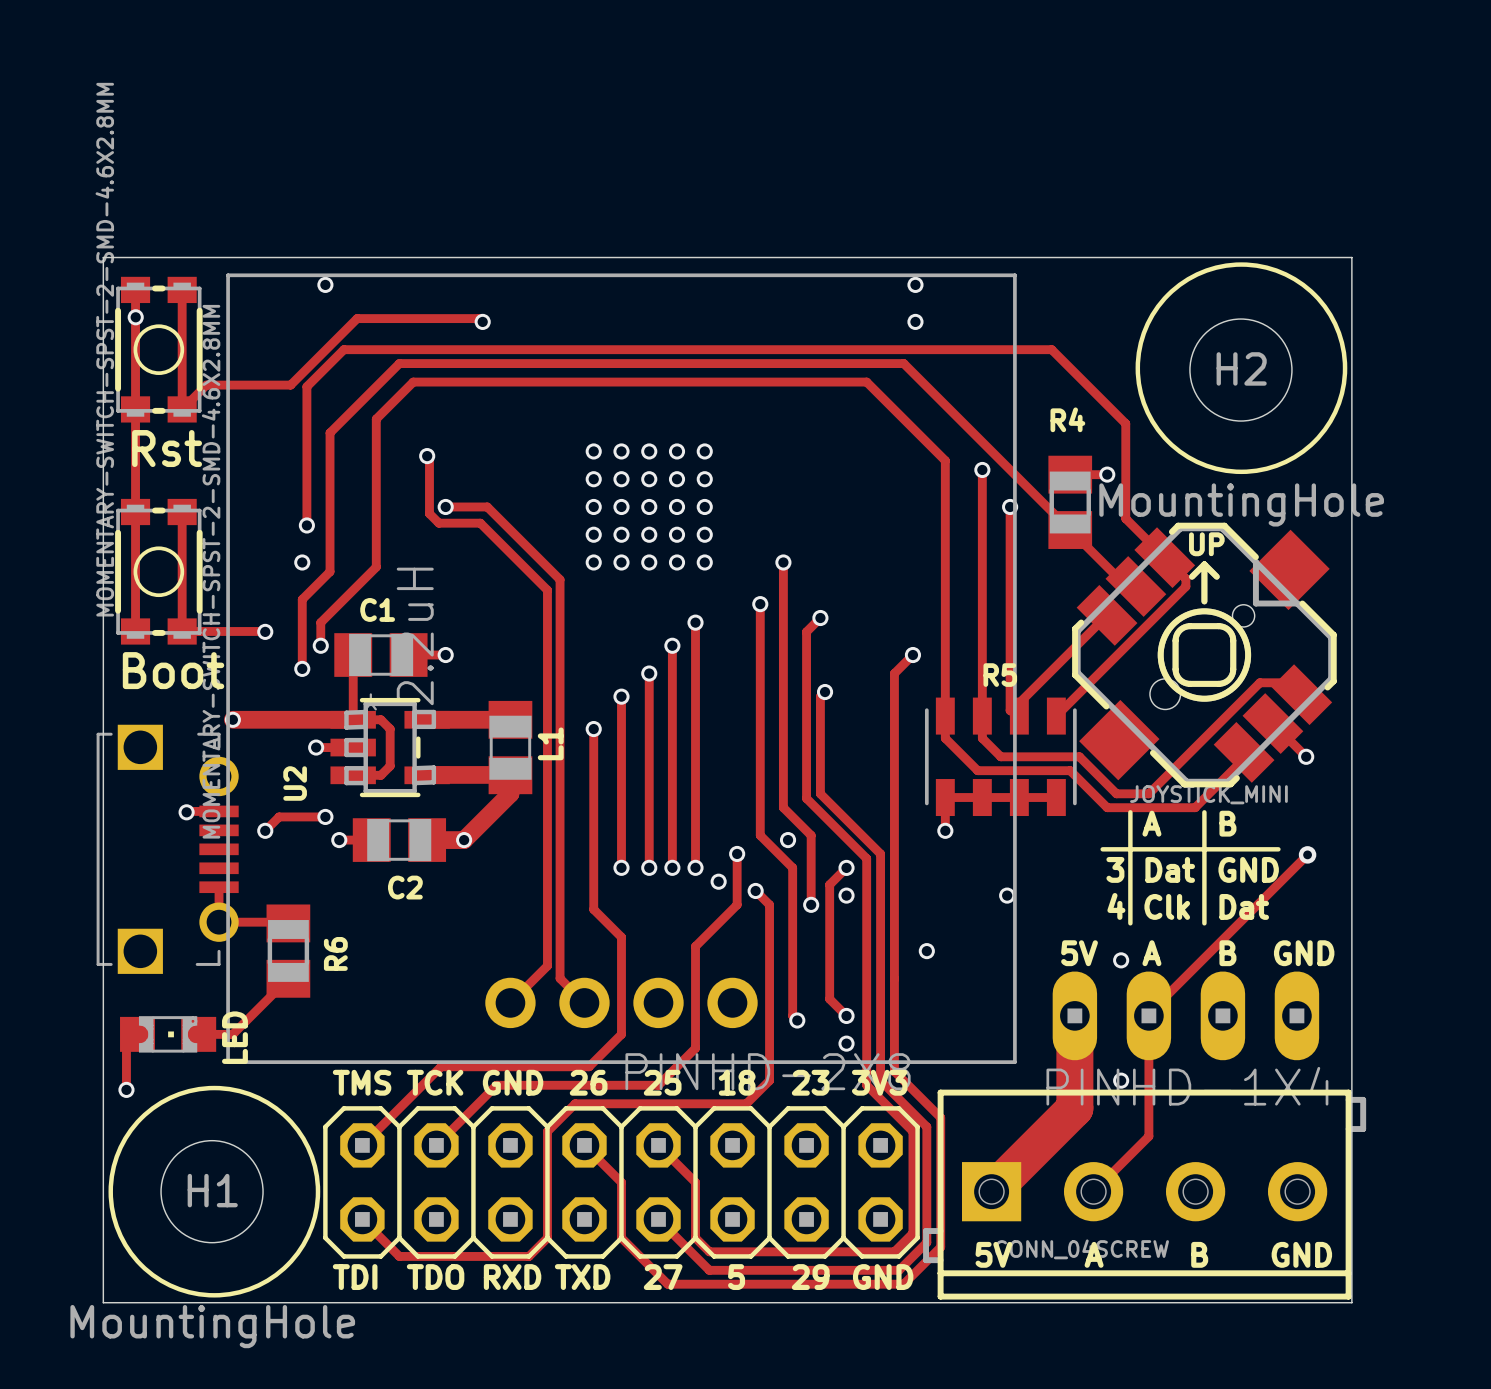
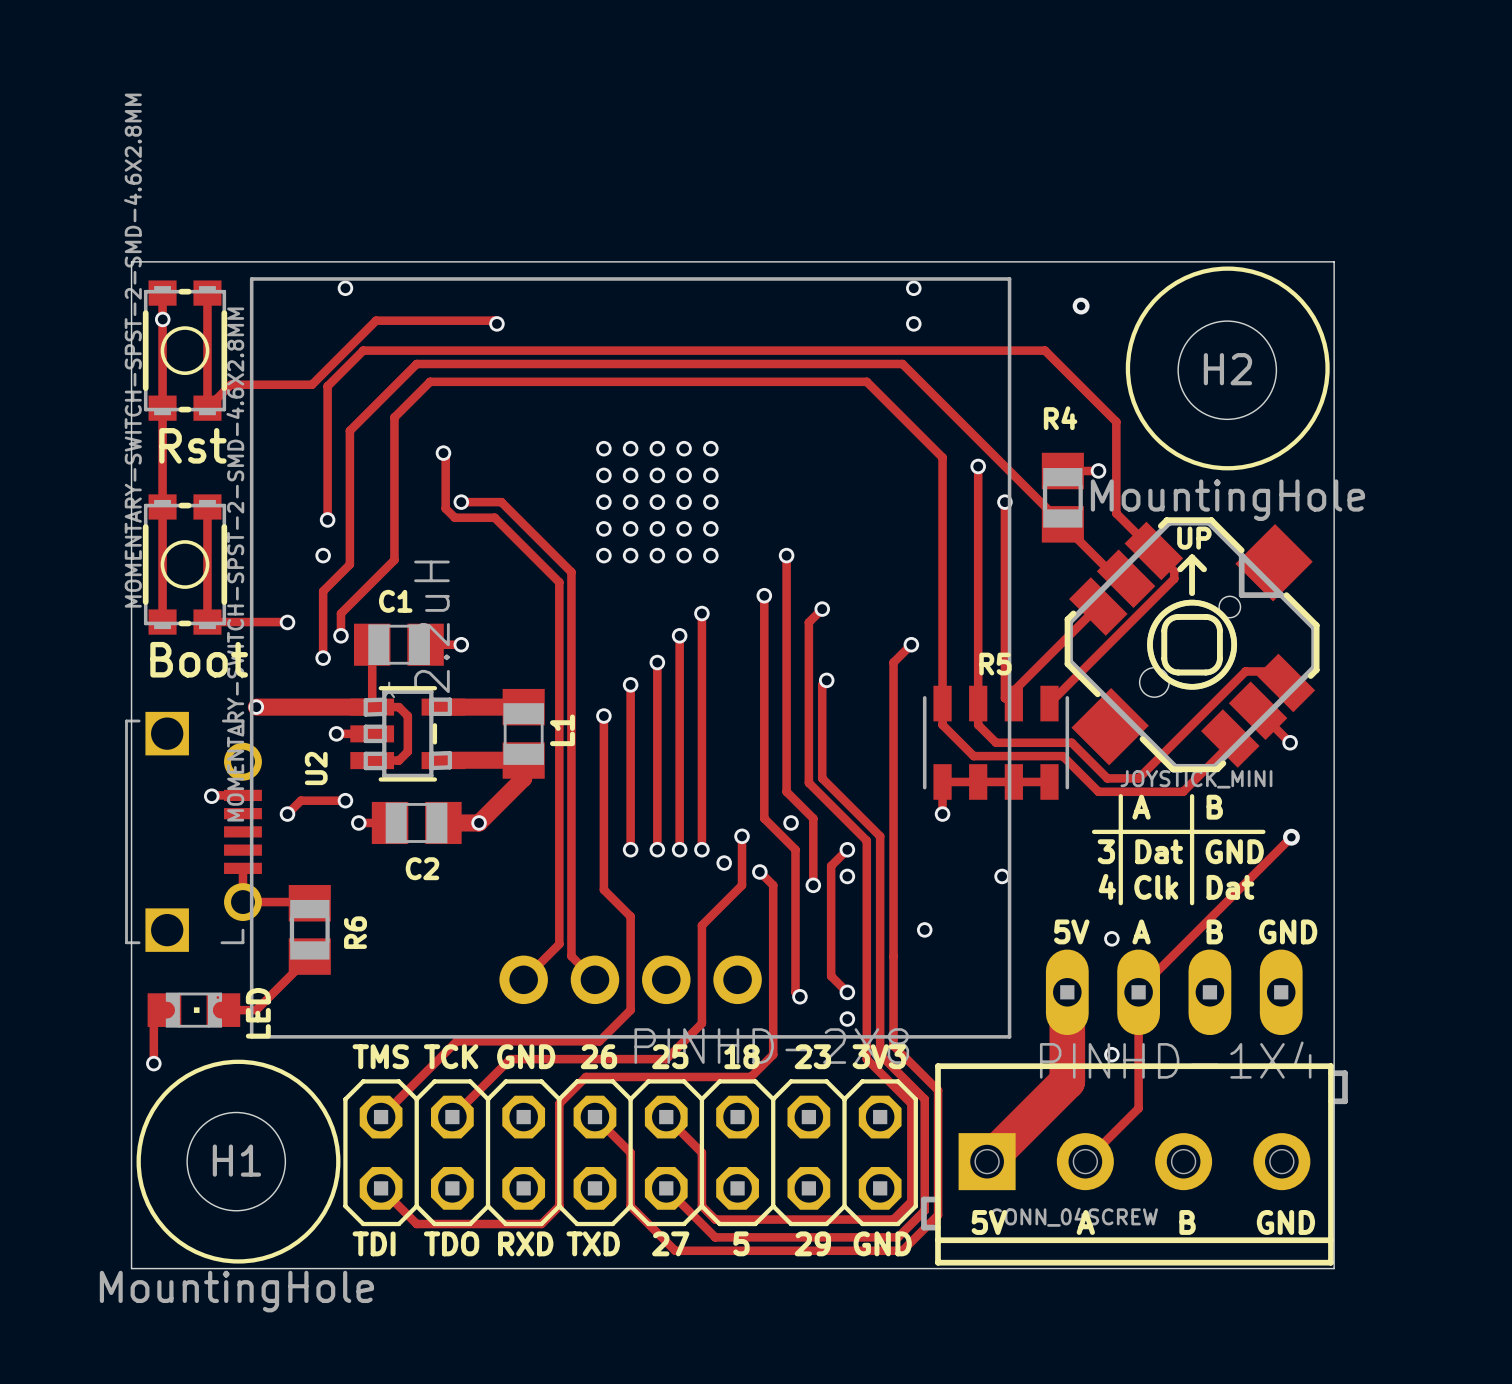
via: none -> (1081, 306)

